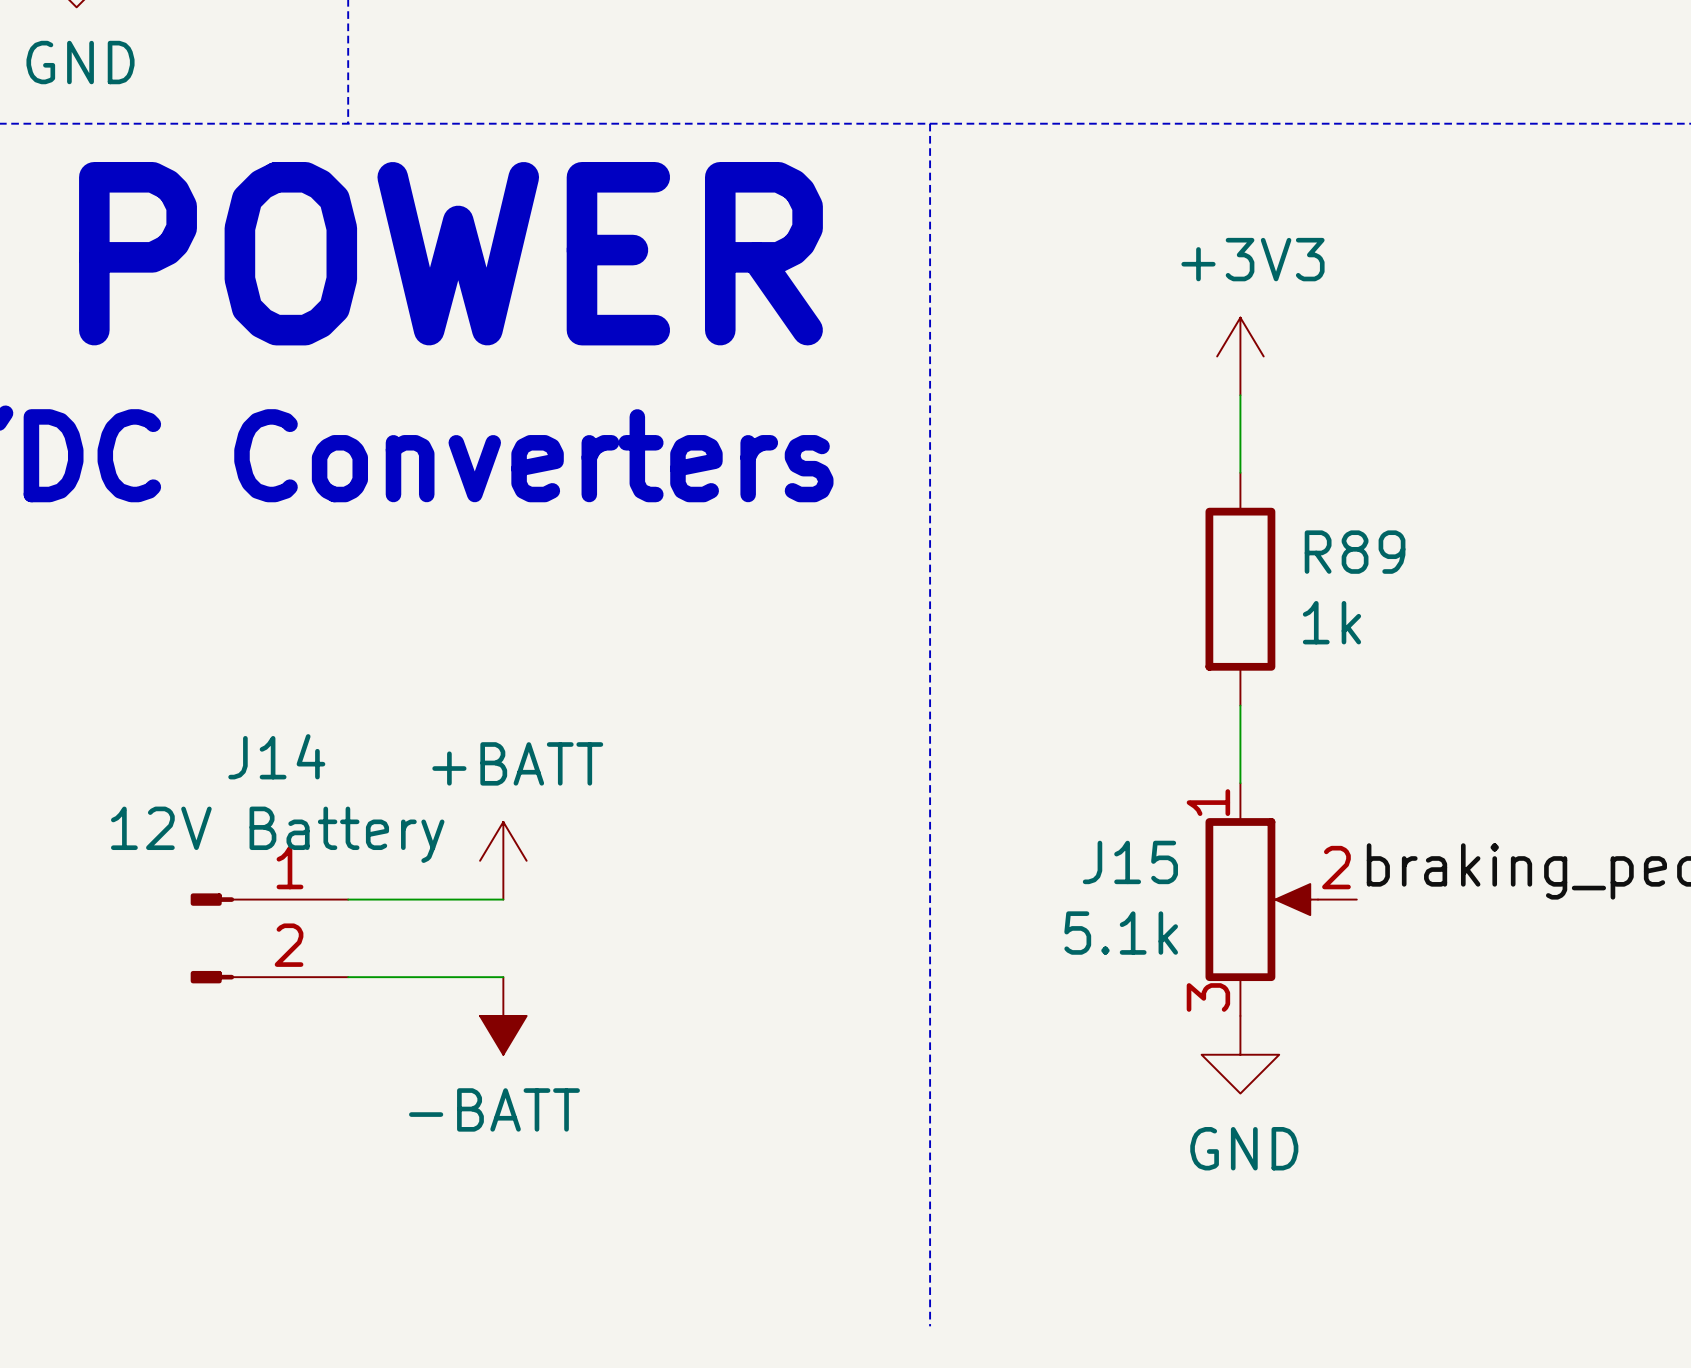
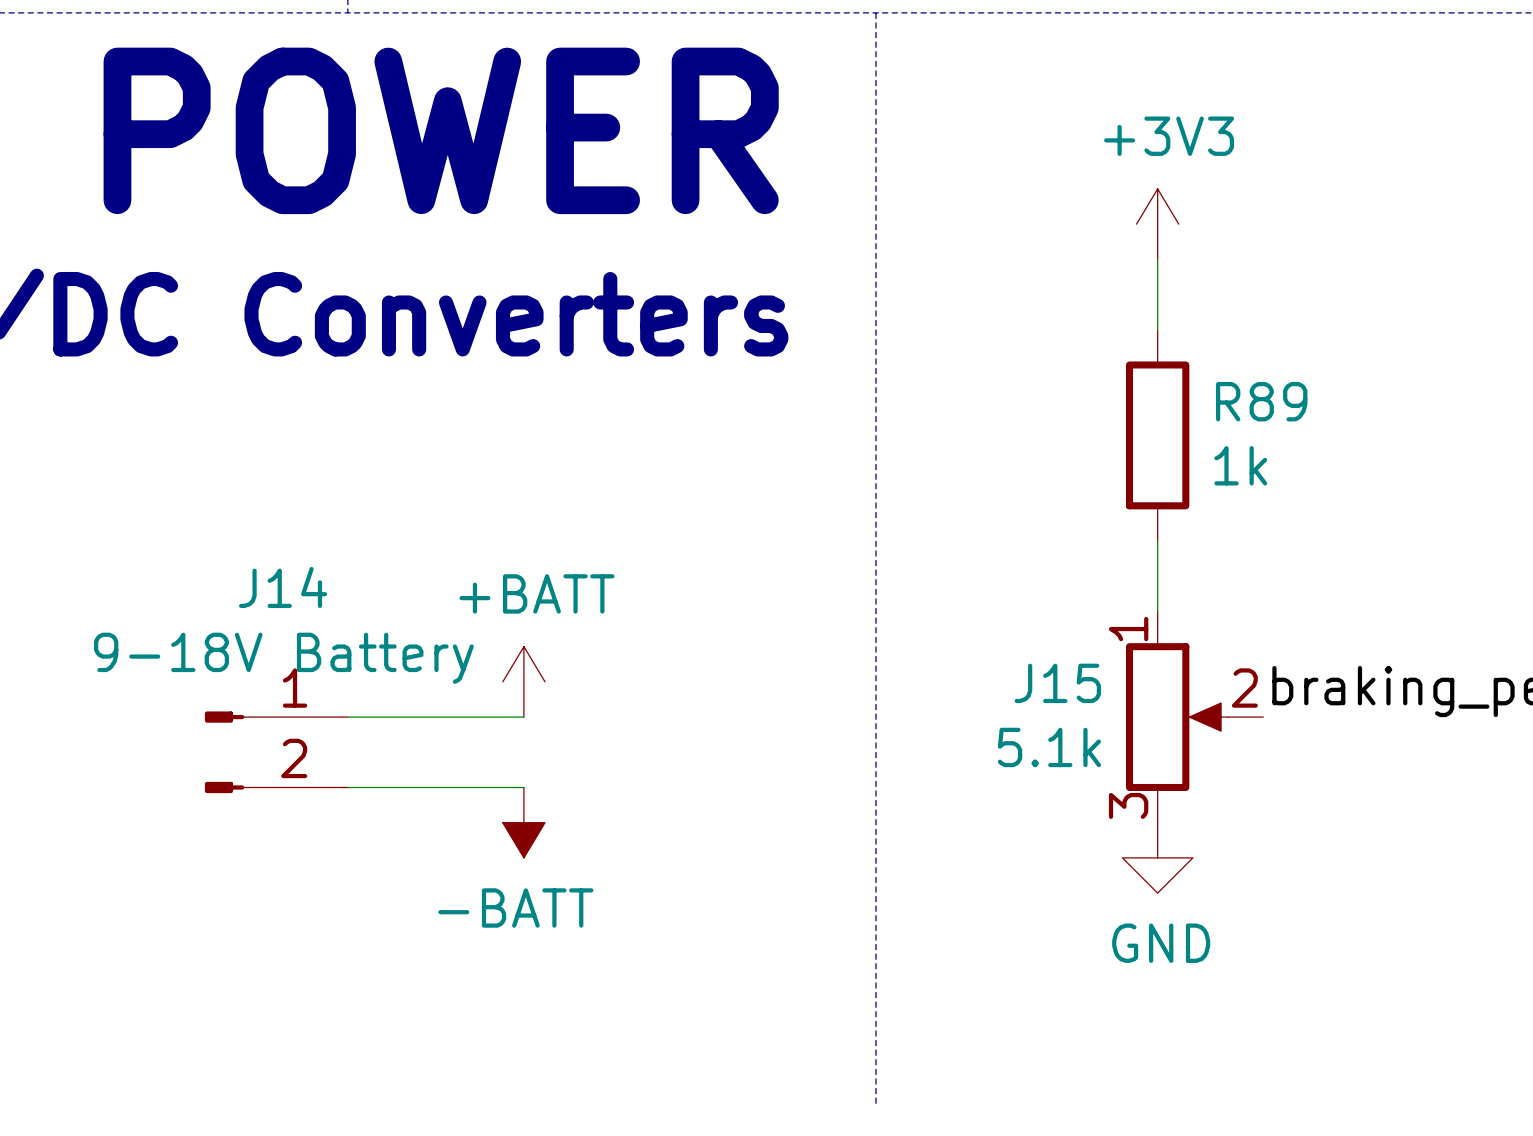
J14 value: 12V Battery (277, 834) -> 9-18V Battery (283, 658)
power symbol position: +BATT (503, 860) -> +BATT (523, 681)
wire: none -> (488, 717) (523, 717)
wire: none -> (488, 787) (523, 787)
power symbol position: -BATT (503, 1015) -> -BATT (523, 822)

